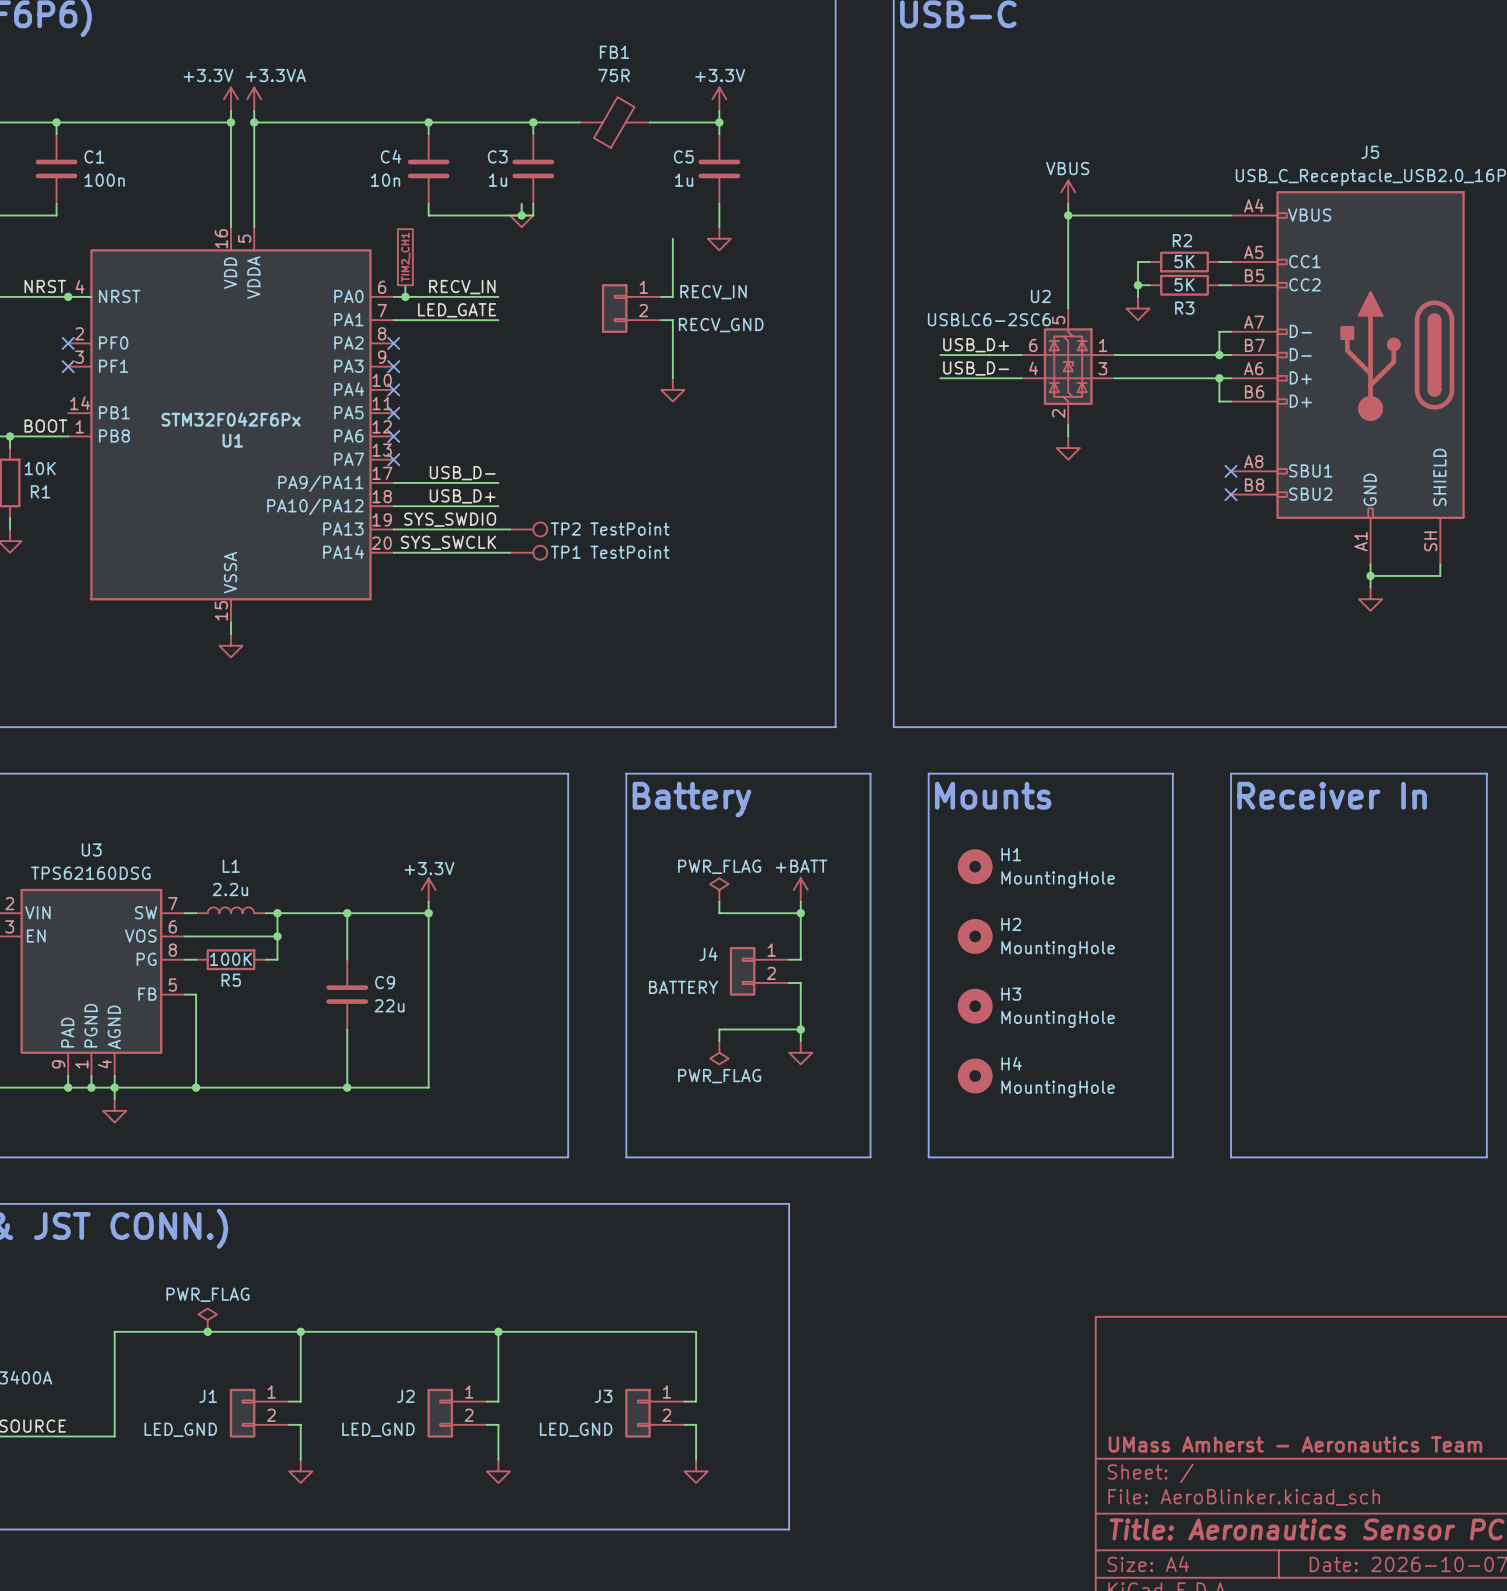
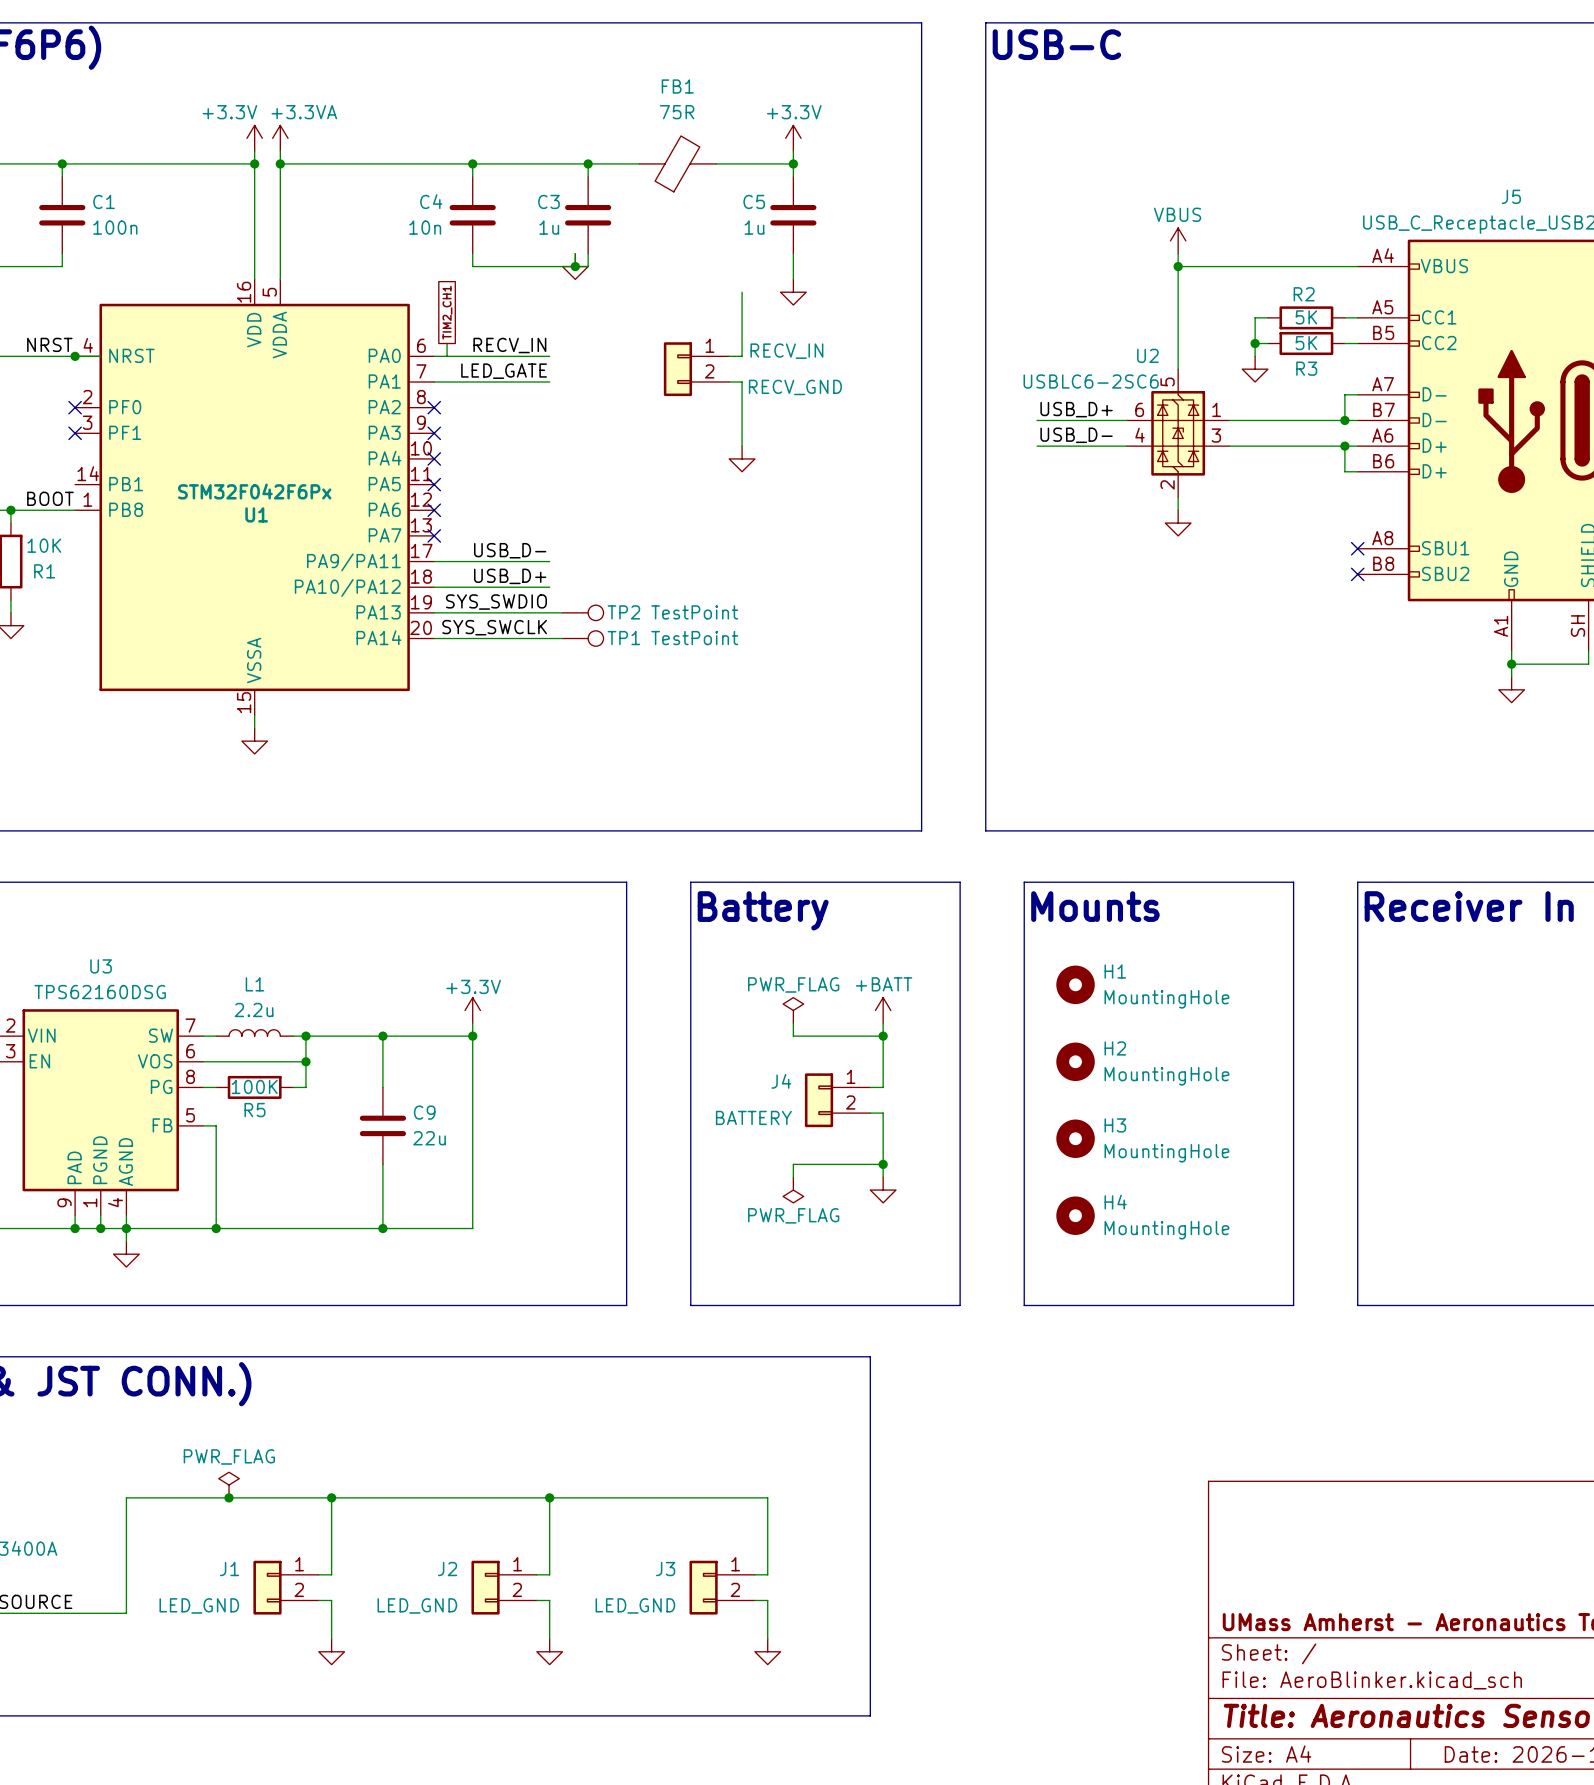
junction: (405, 296) -> none

